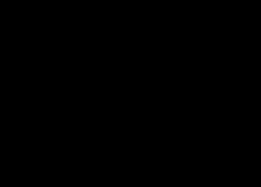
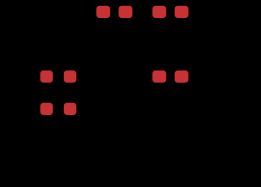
part: none -> (114, 11)
part: none -> (170, 11)
part: none -> (58, 76)
part: none -> (170, 76)
part: none -> (58, 108)

